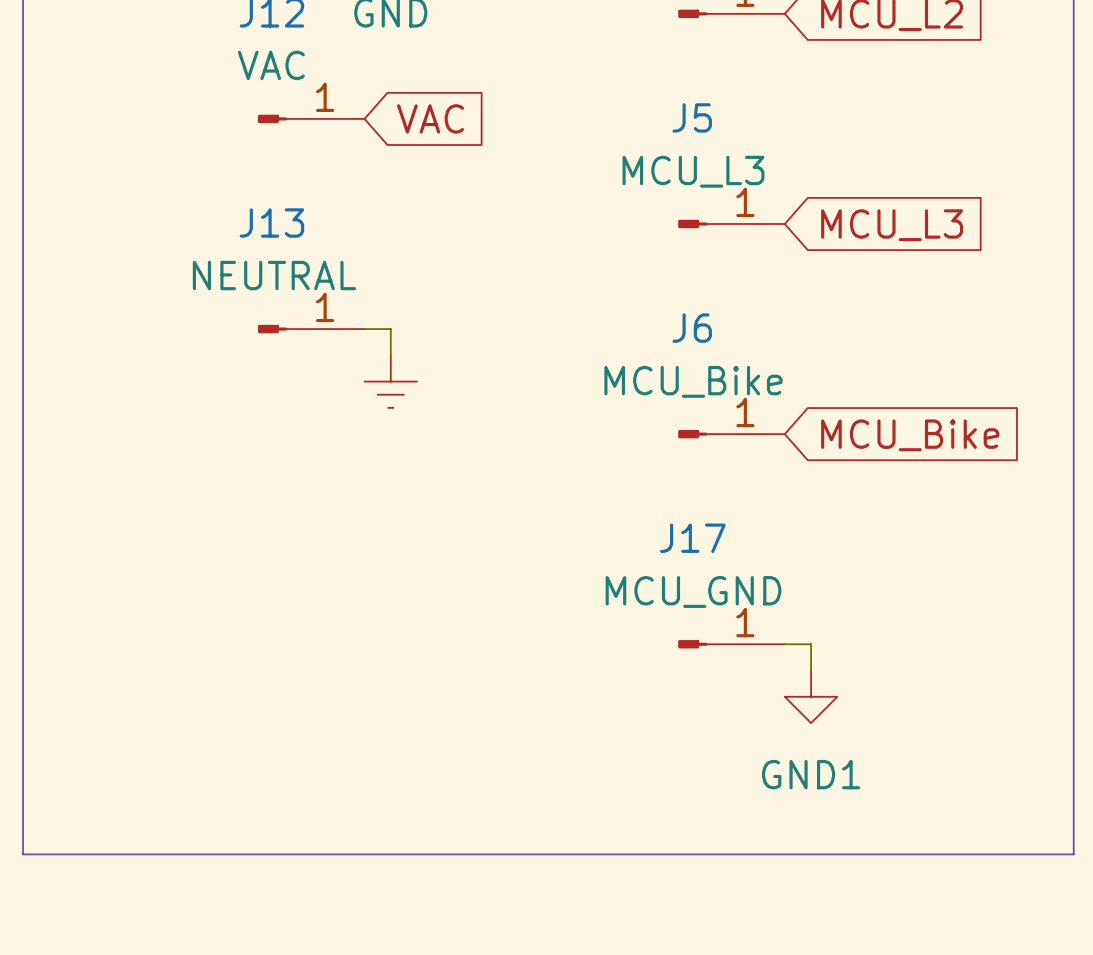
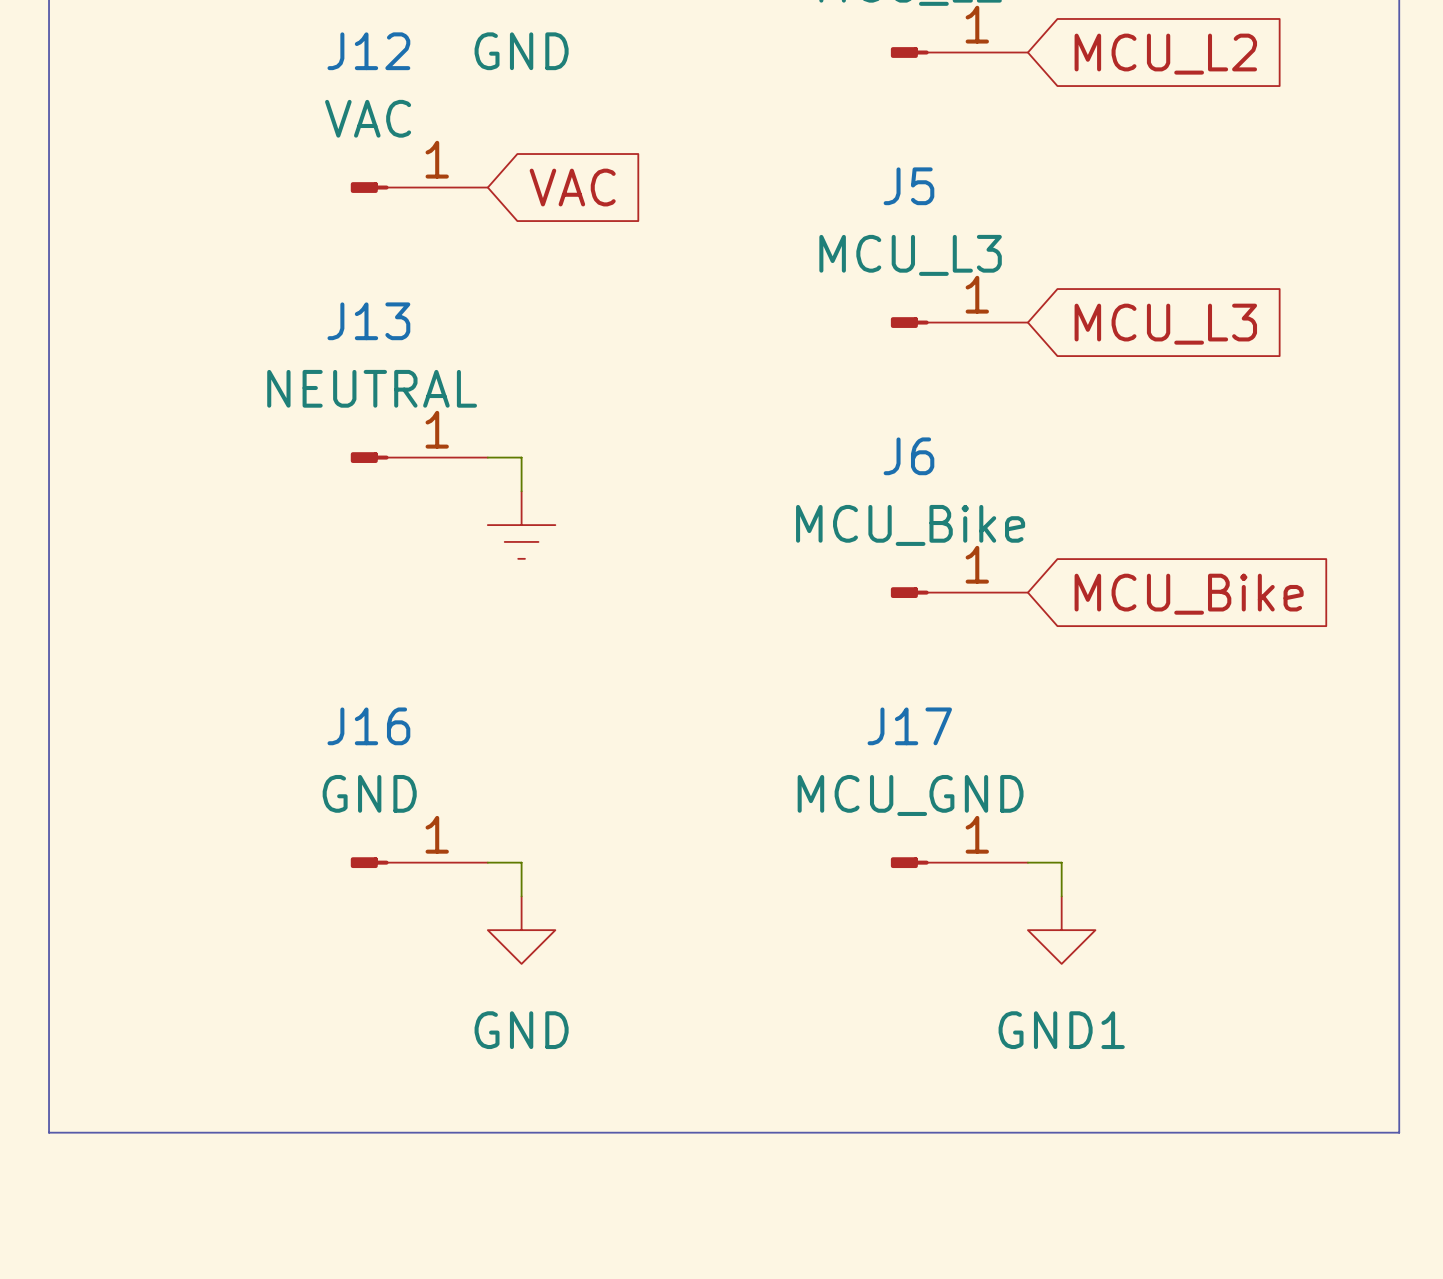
J16: none -> GND (419, 862)
wire: none -> (487, 862) (521, 862) (521, 896)
power symbol: none -> GND (521, 930)

